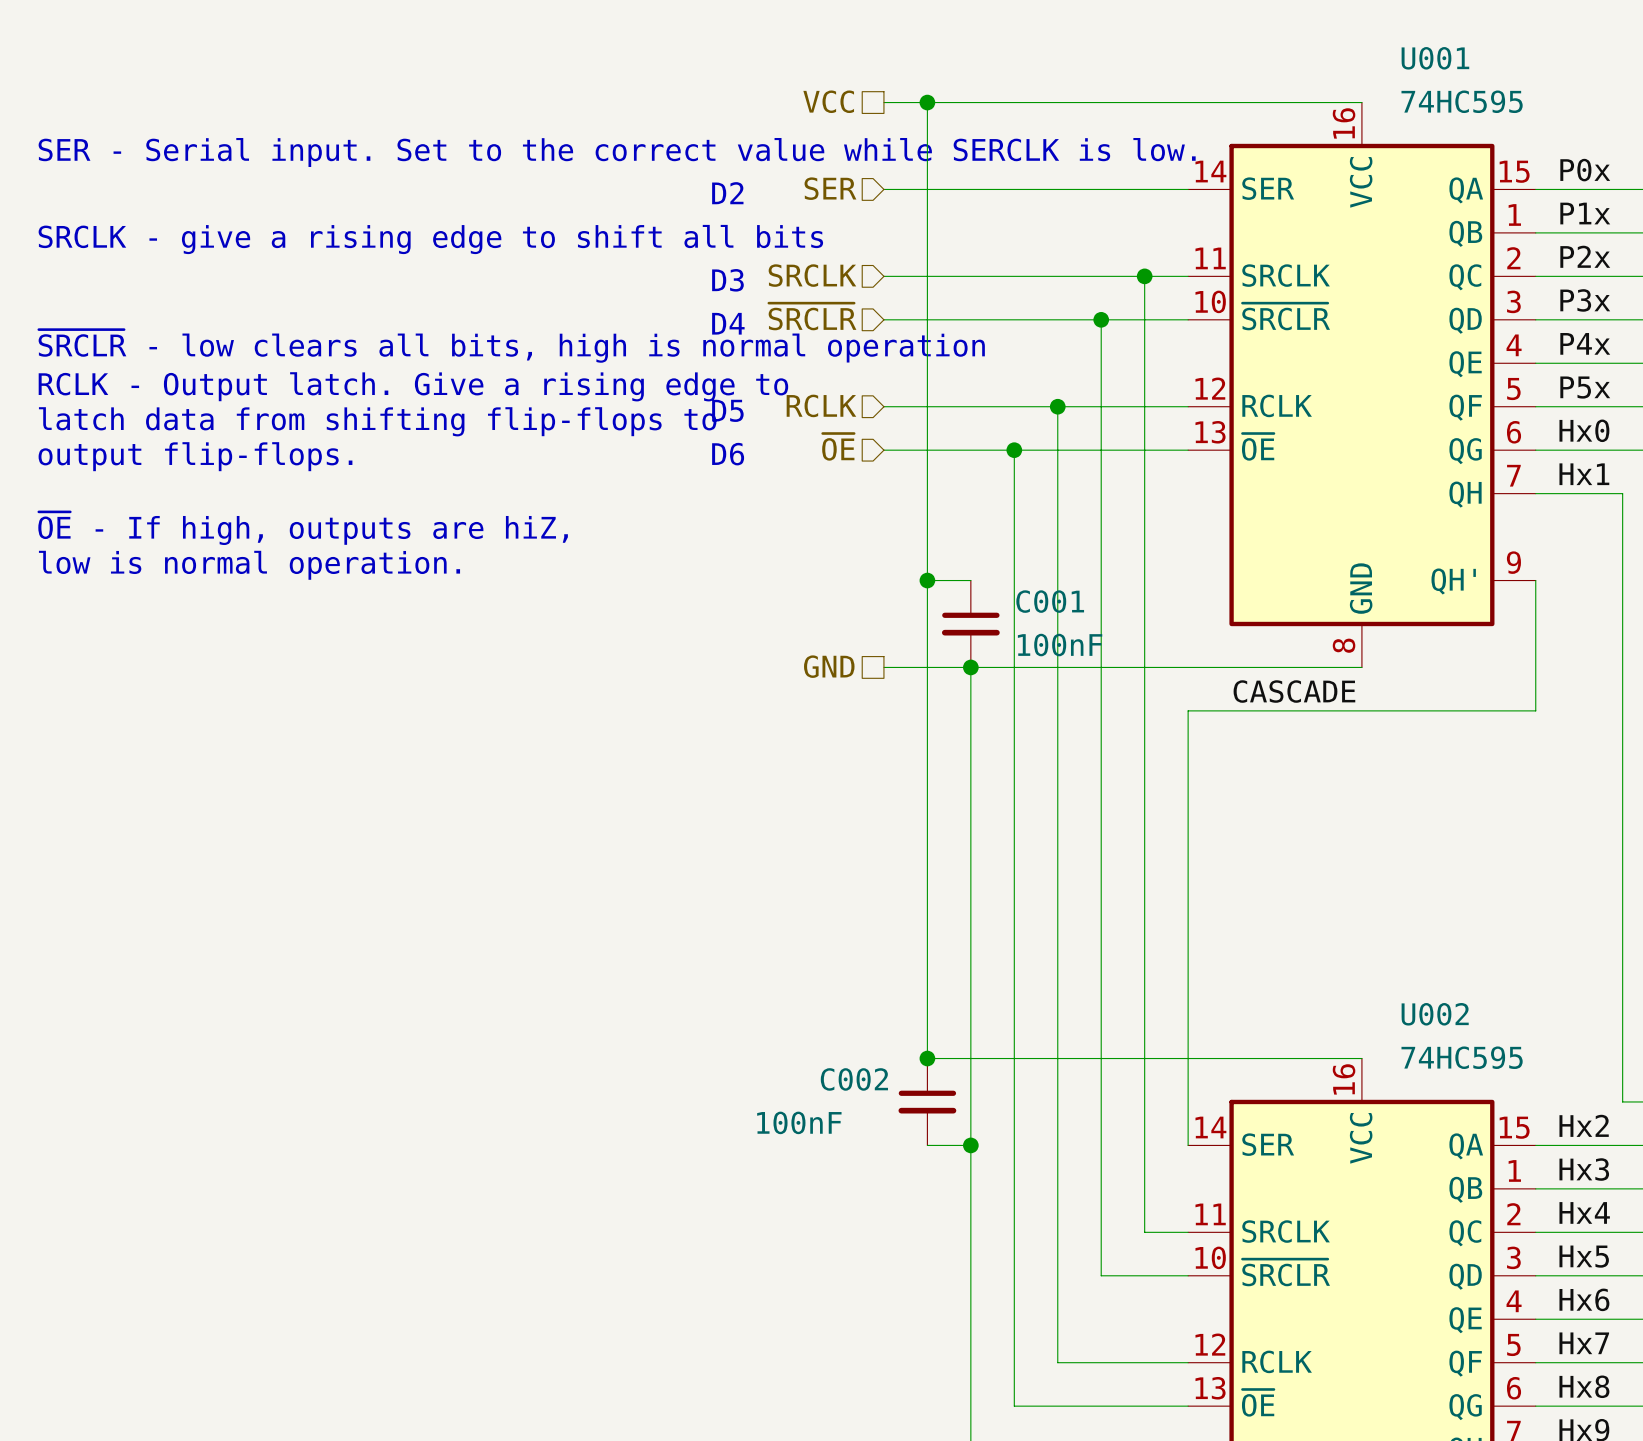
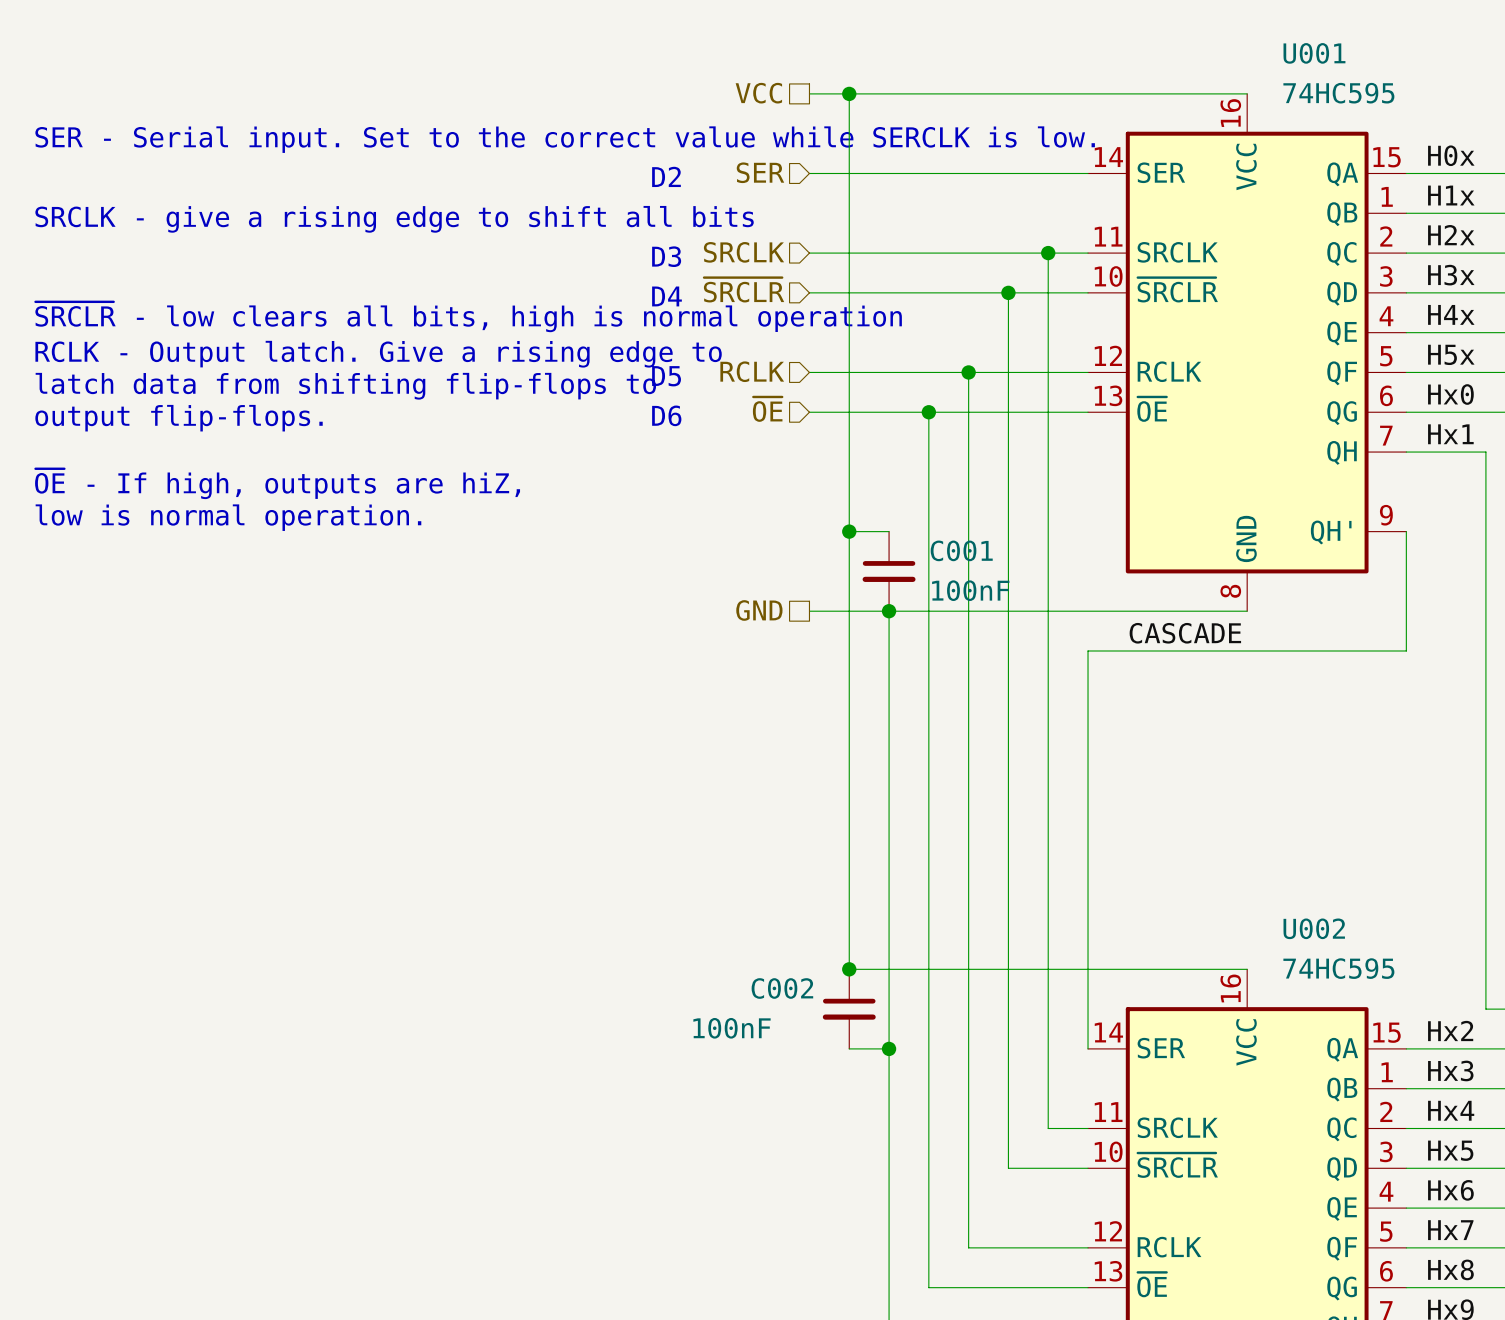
label: P0x (1585, 170) -> H0x (1451, 155)
label: P1x (1585, 213) -> H1x (1451, 195)
label: P2x (1585, 256) -> H2x (1451, 235)
label: P3x (1585, 300) -> H3x (1451, 275)
label: P4x (1585, 343) -> H4x (1451, 314)
label: P5x (1585, 387) -> H5x (1451, 354)

